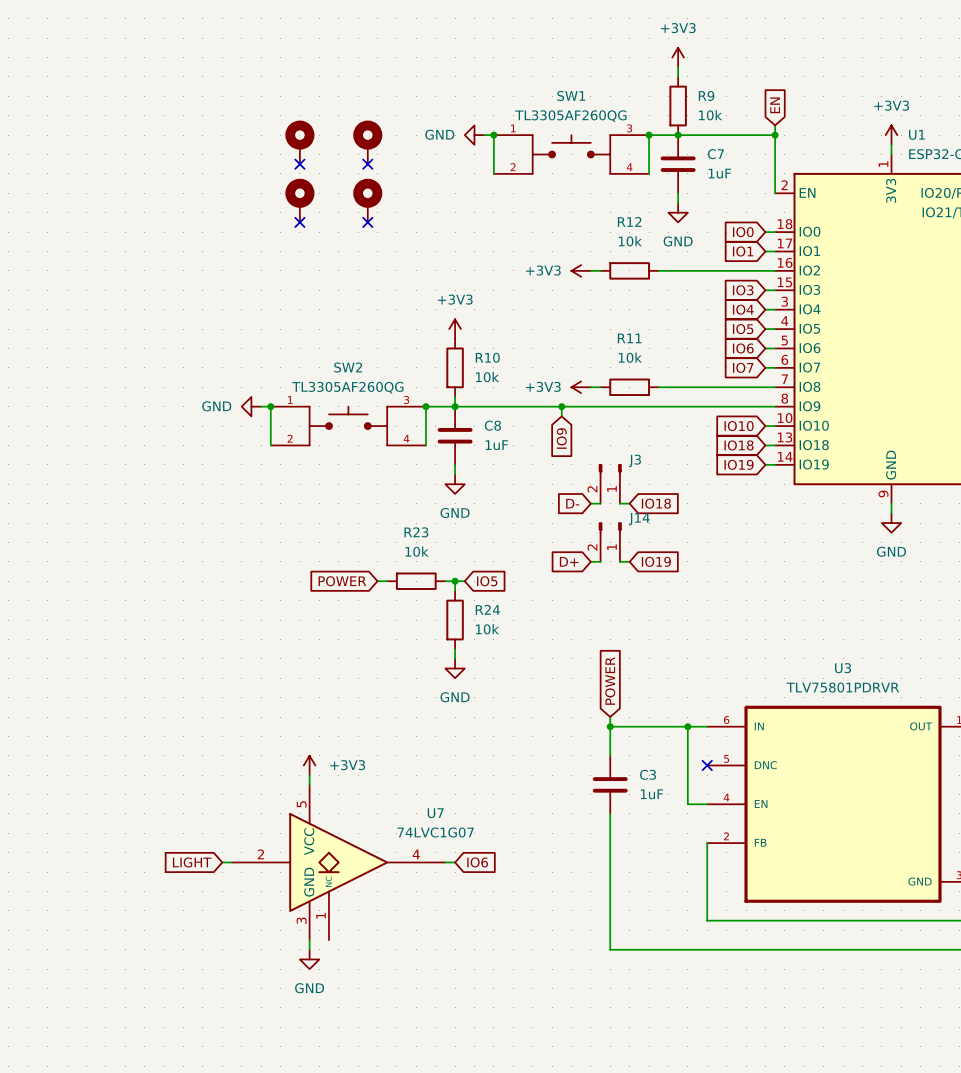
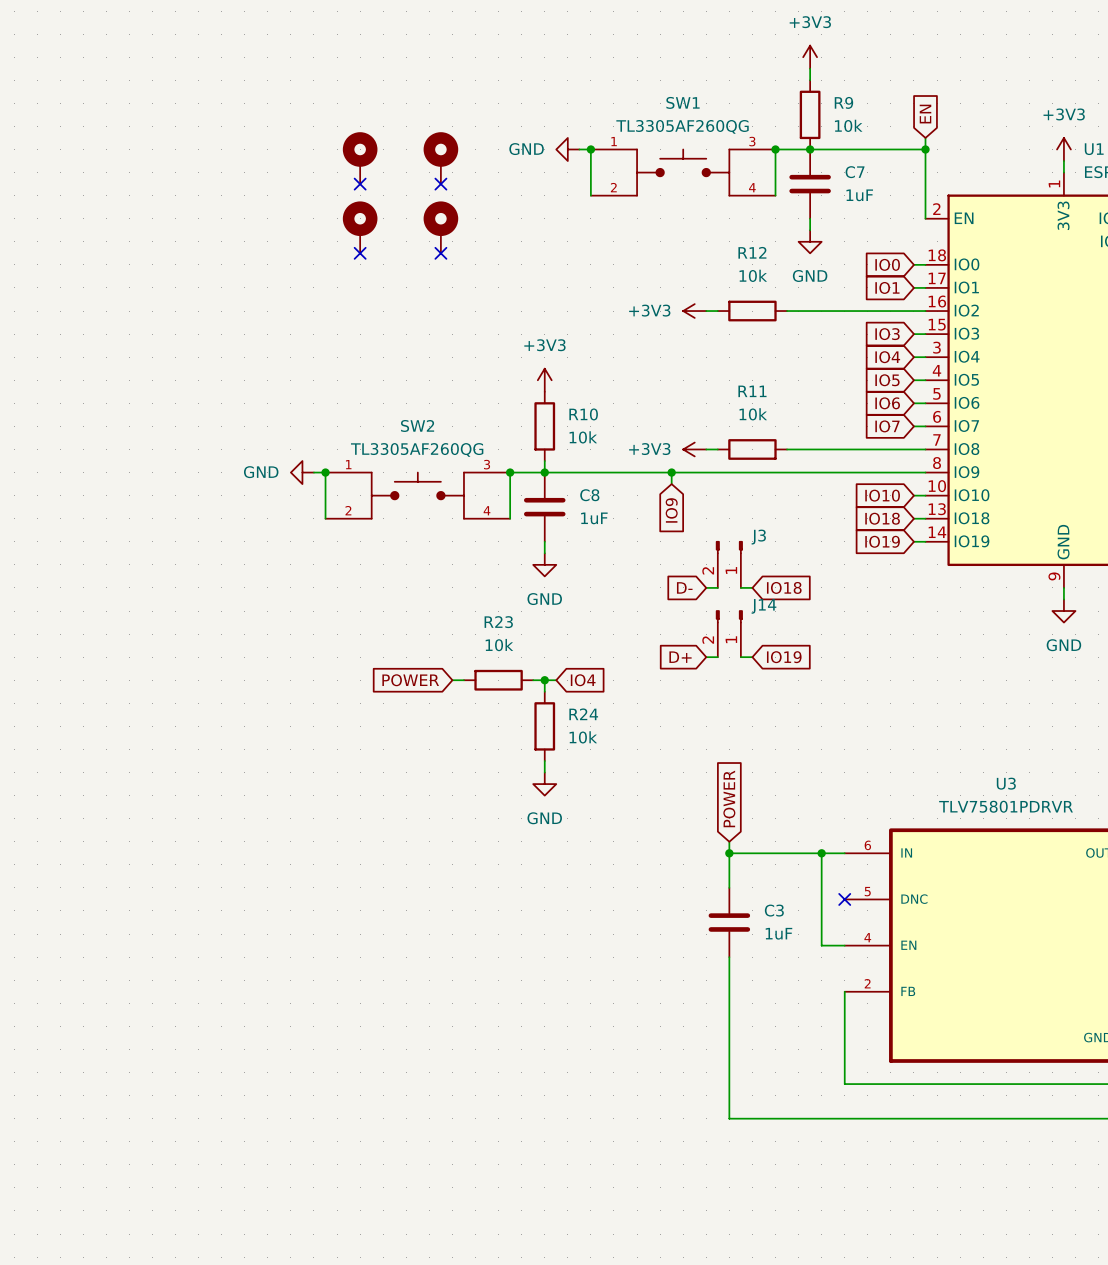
global label: IO5 (487, 581) -> IO4 (583, 680)
power symbol: +3V3 (309, 765) -> none
wire: (309, 775) (309, 784) -> none
global label: LIGHT (192, 862) -> none
wire: (222, 862) (232, 862) -> none
U7: 74LVC1G07 (338, 862) -> none
wire: (445, 862) (455, 862) -> none
global label: IO6 (477, 862) -> none
wire: (309, 940) (309, 949) -> none
power symbol: GND (309, 959) -> none

